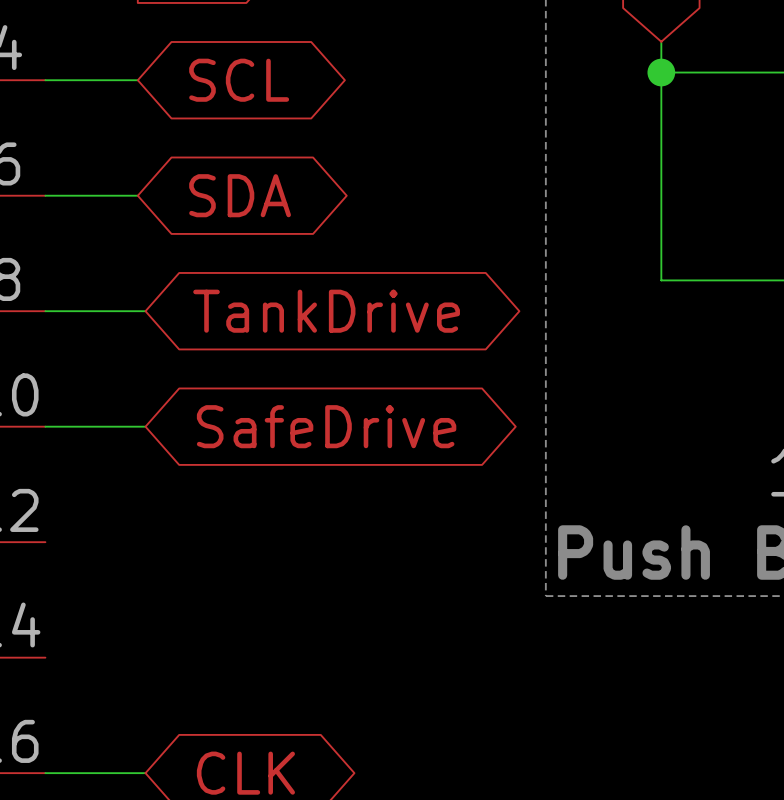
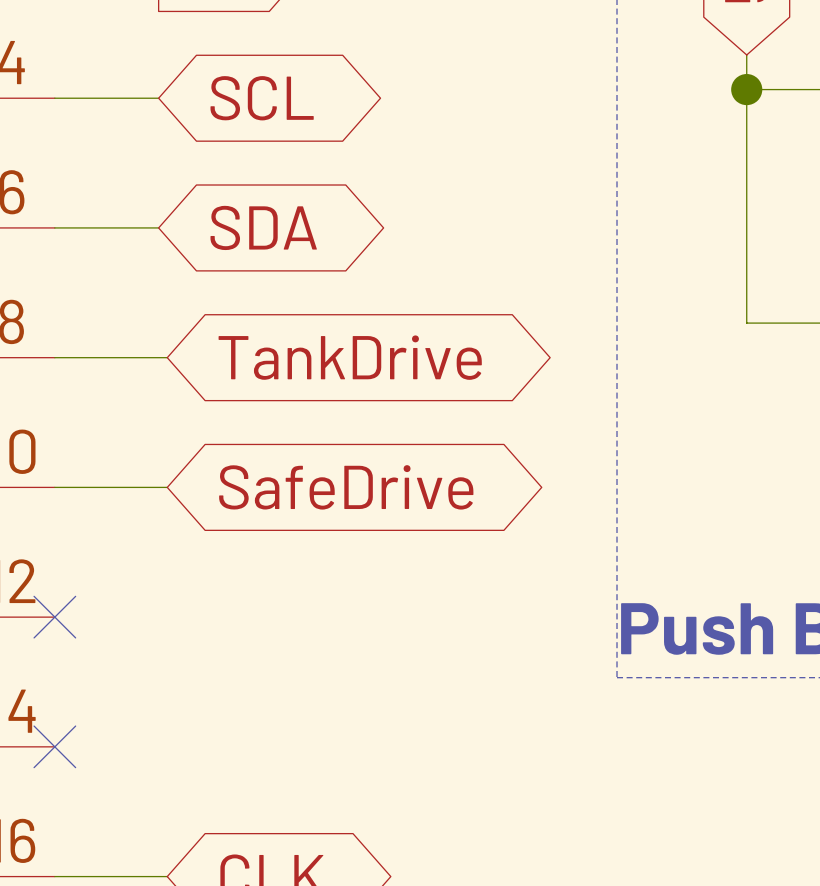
no-connect mark: none -> (54, 617)
no-connect mark: none -> (54, 746)

